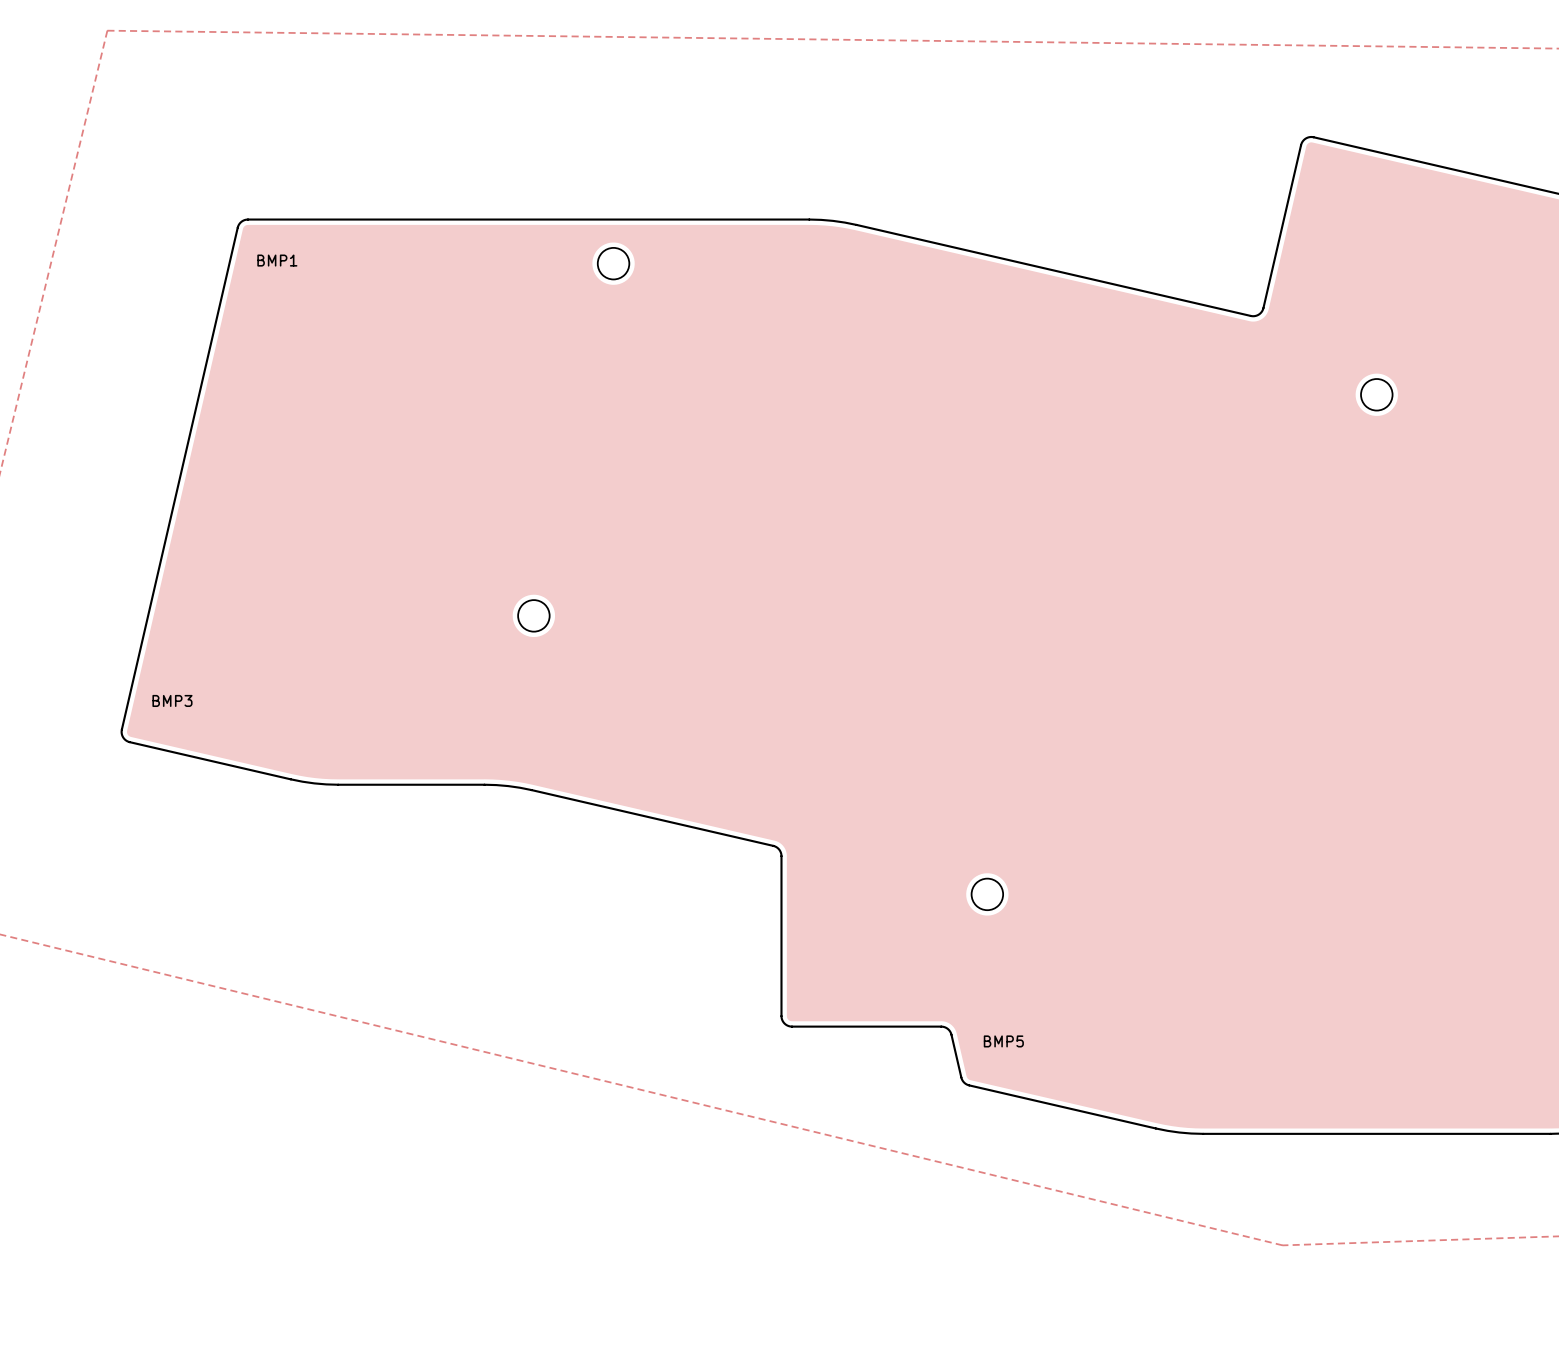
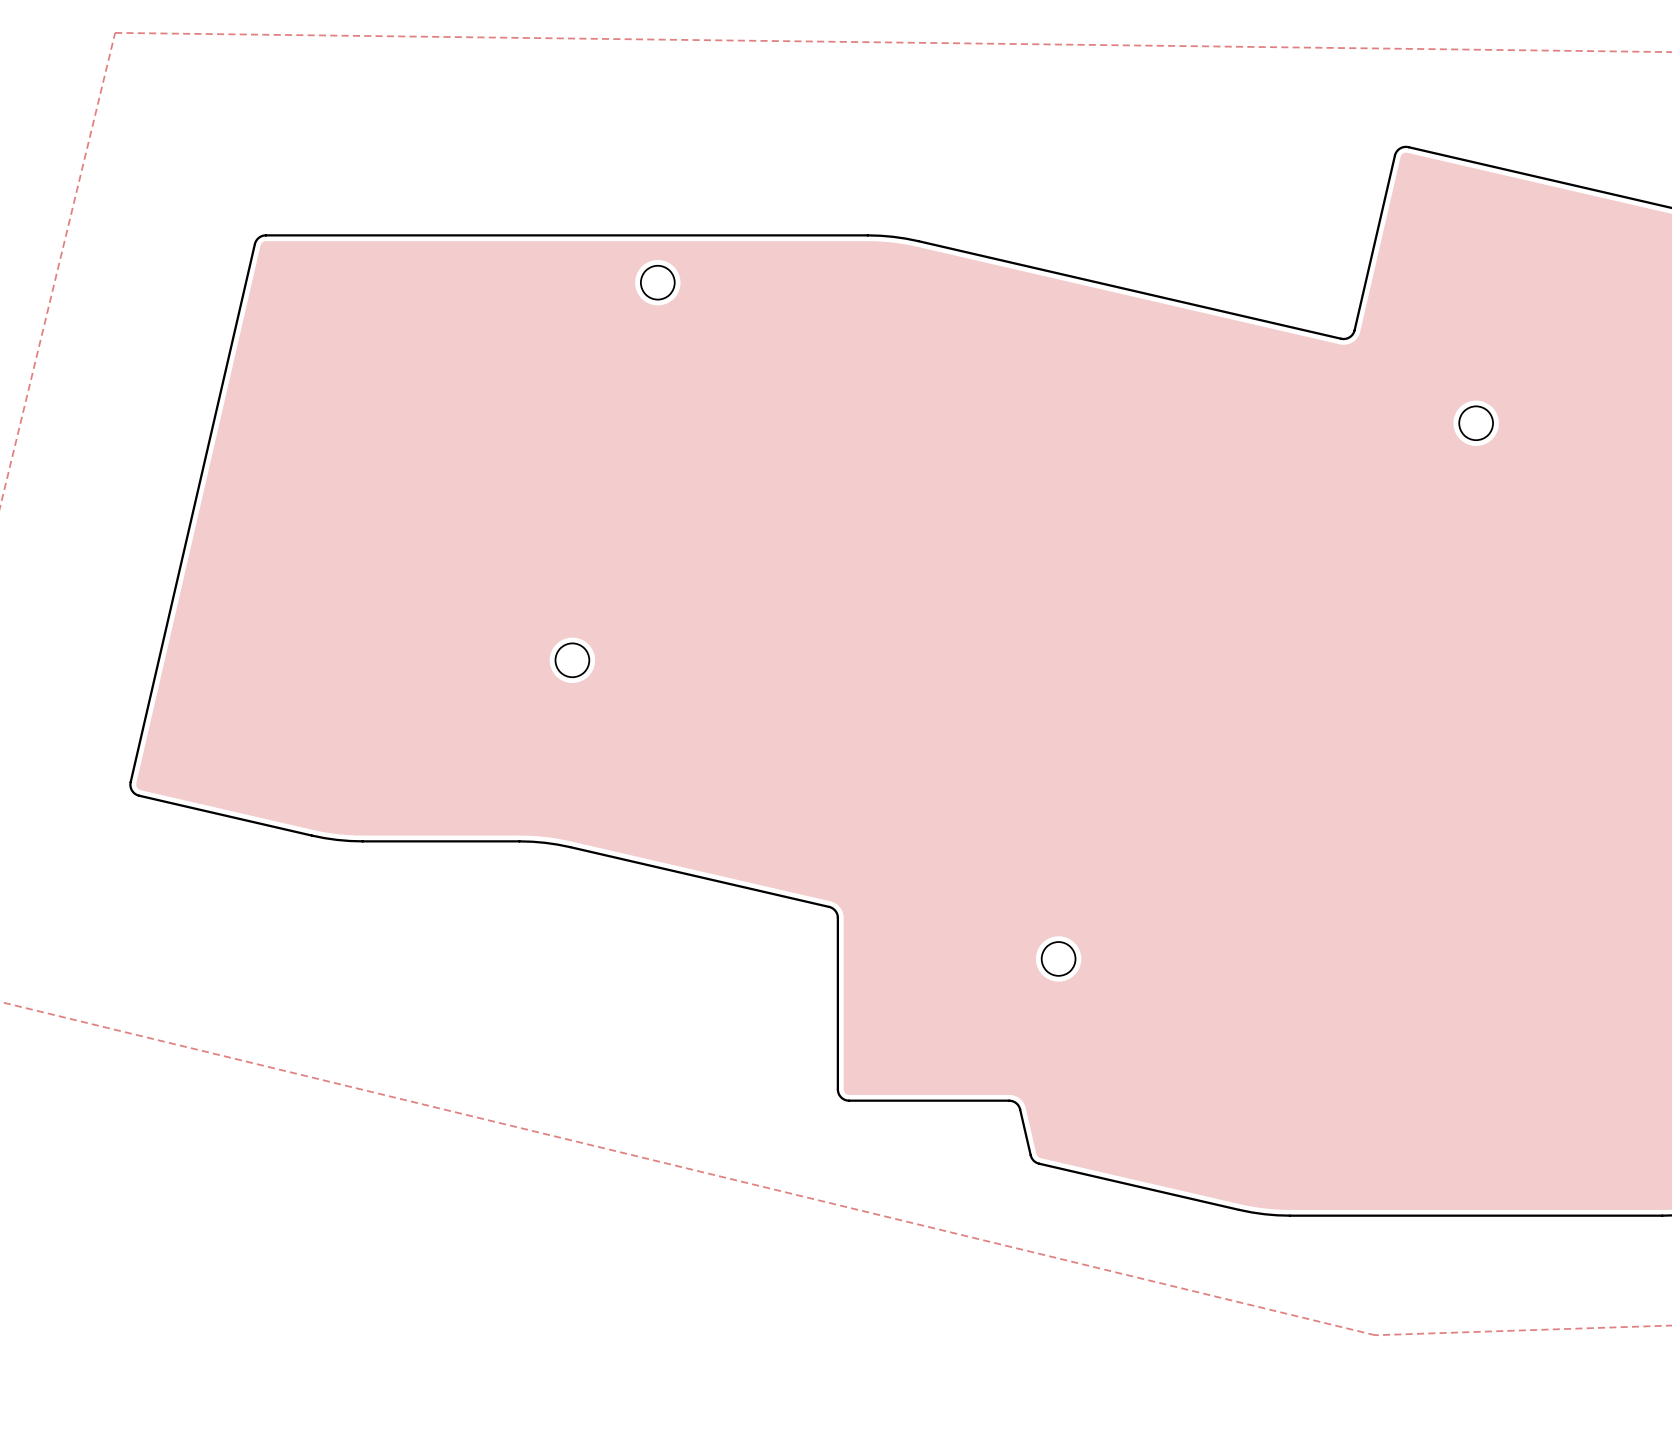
BMP1: (277, 260) -> none
BMP3: (172, 700) -> none
BMP5: (1003, 1041) -> none

